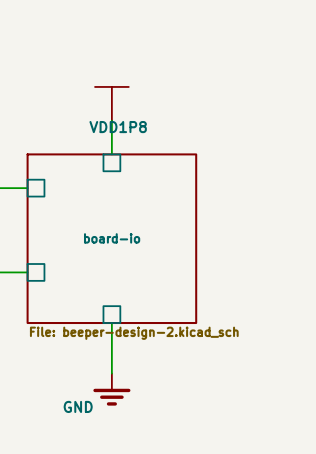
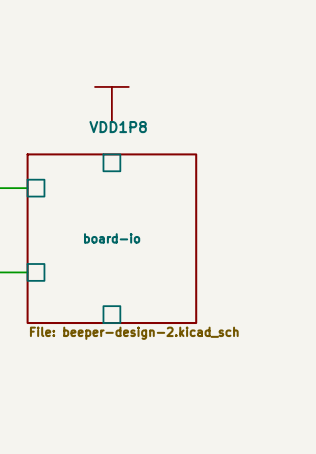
wire: (111, 120) (111, 154) -> none
wire: (111, 323) (111, 373) -> none
power symbol: GND (111, 389) -> none

